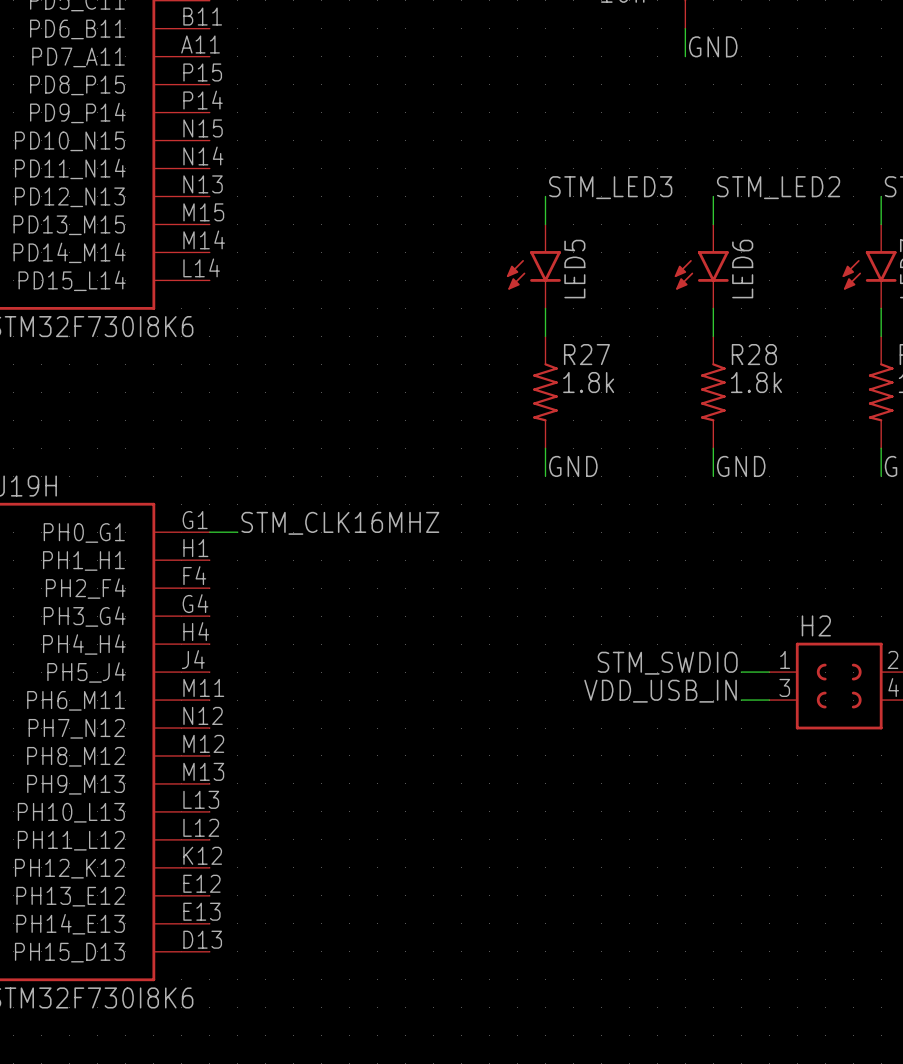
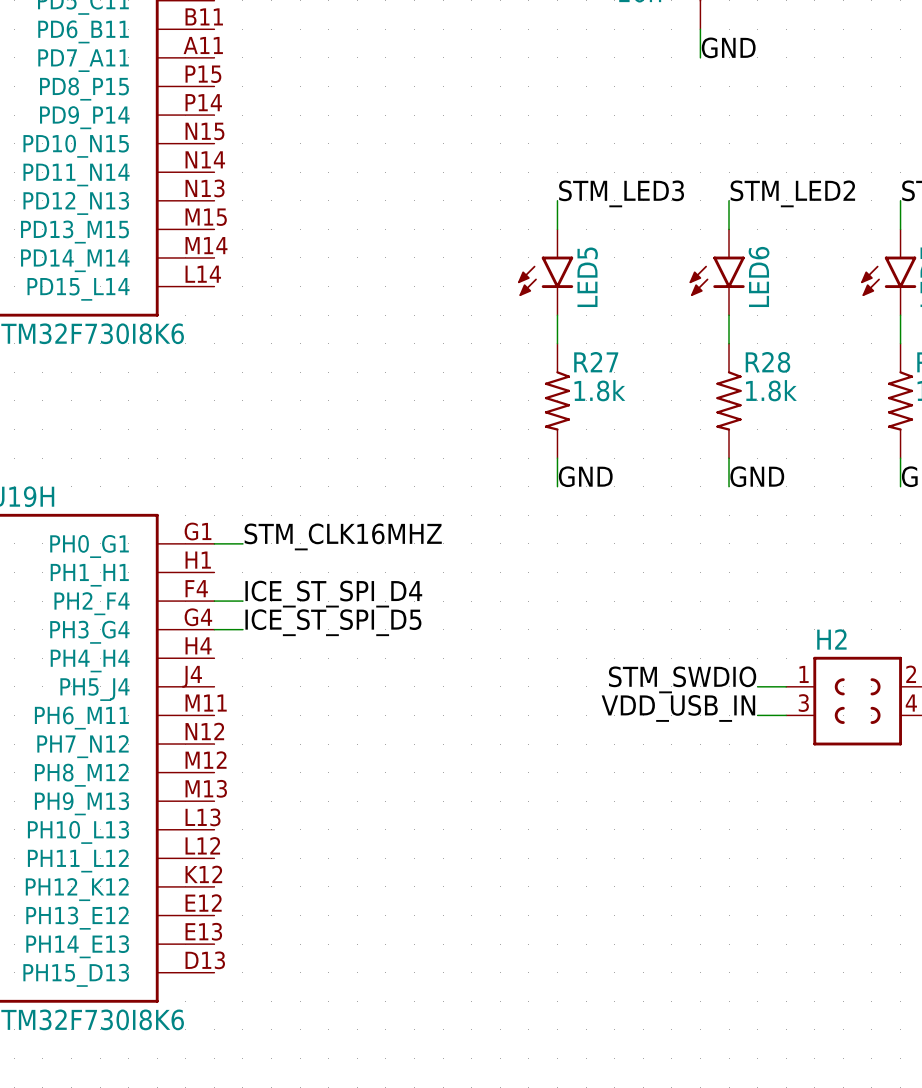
label: none -> ICE_ST_SPI_D4 (333, 594)
wire: none -> (214, 601) (242, 601)
label: none -> ICE_ST_SPI_D5 (333, 622)
wire: none -> (214, 629) (242, 629)

